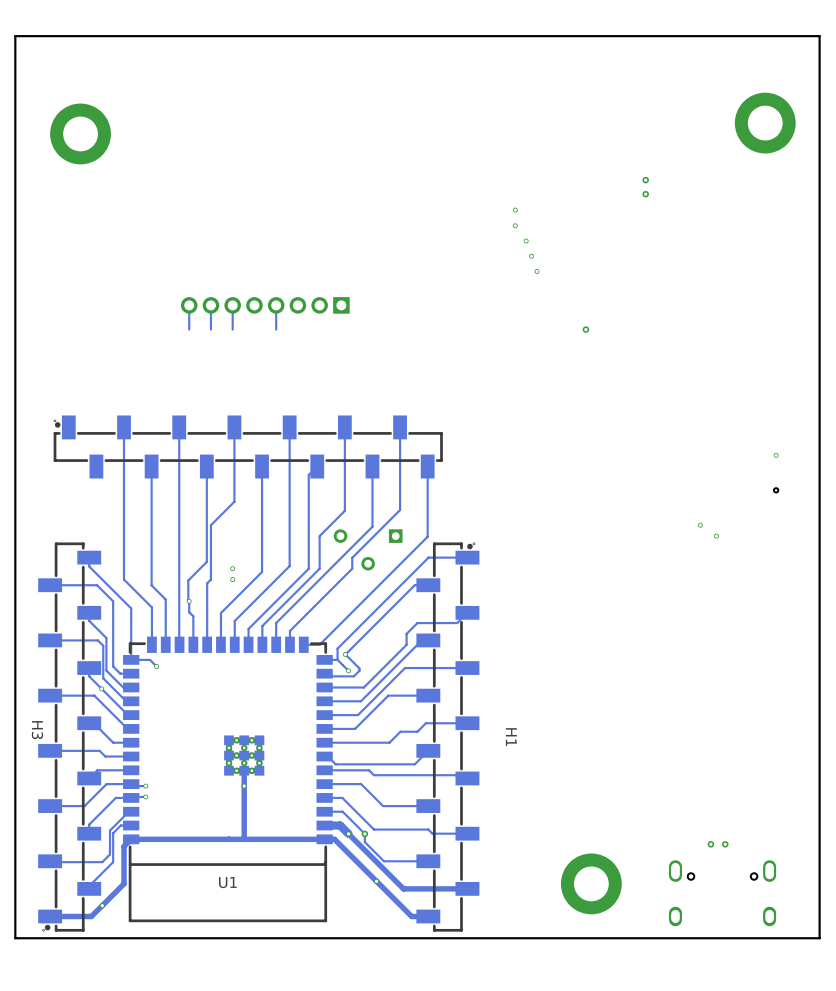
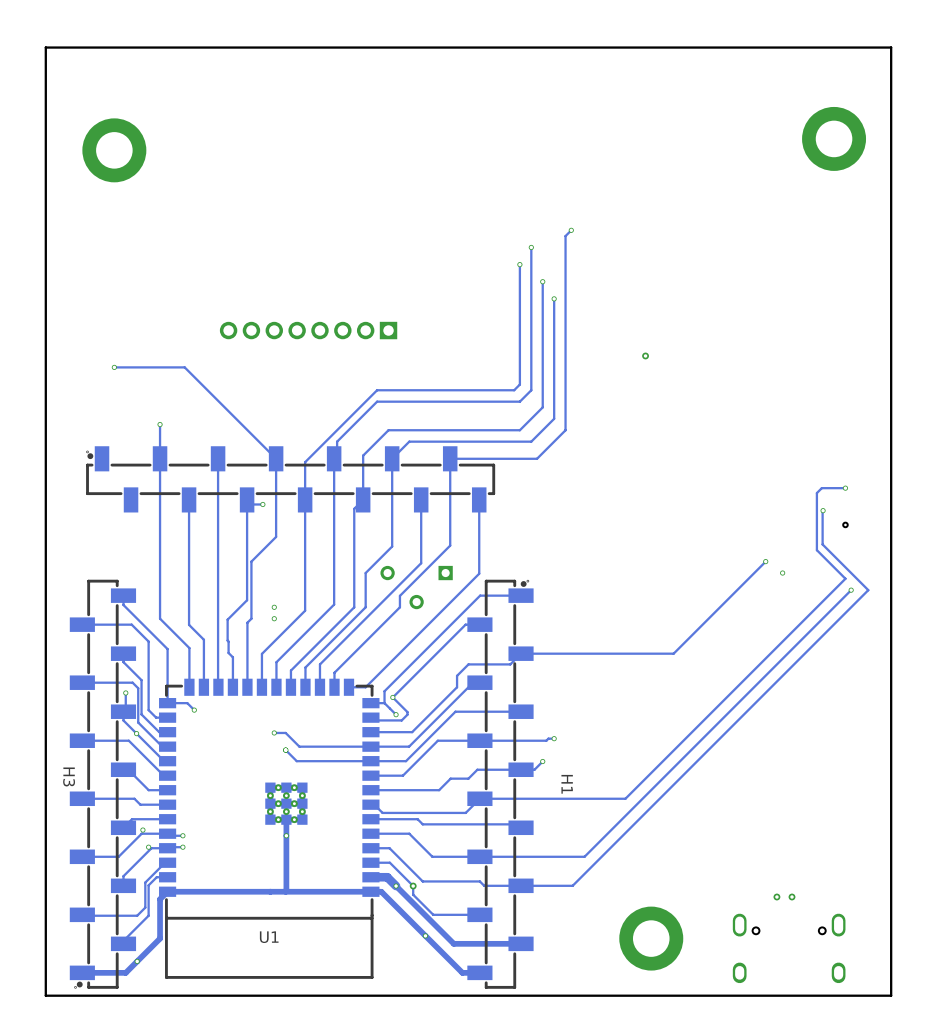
via: (645, 180) -> none
via: (645, 194) -> none
track: none -> (571, 230) (565, 236) (565, 430) (537, 458) (450, 458)
via: (515, 225) -> none
track: none -> (531, 247) (531, 390) (519, 401) (377, 401) (337, 441) (337, 455) (334, 458)
via: none -> (531, 247)
via: (526, 241) -> none
track: none -> (519, 264) (519, 384) (514, 390) (377, 390) (305, 462) (305, 499)
via: none -> (519, 264)
via: (531, 256) -> none
track: none -> (542, 281) (542, 407) (519, 430) (388, 430) (363, 455) (363, 499)
via: none -> (542, 281)
via: (537, 271) -> none
track: none -> (554, 298) (554, 418) (531, 441) (409, 441) (392, 458)
via: none -> (554, 298)
track: (189, 305) (189, 329) -> none
track: (210, 305) (210, 329) -> none
track: (232, 305) (232, 329) -> none
track: (276, 305) (276, 329) -> none
track: none -> (114, 367) (184, 367) (276, 458)
via: none -> (114, 367)
track: none -> (160, 424) (160, 458)
via: none -> (160, 424)
track: none -> (845, 488) (821, 488) (816, 493) (816, 550) (845, 578) (625, 798) (479, 798)
track: none -> (247, 499) (251, 504) (262, 504)
via: none -> (262, 504)
track: none -> (822, 510) (822, 544) (868, 590) (572, 885) (521, 885)
via: none -> (823, 510)
track: none -> (765, 561) (673, 653) (521, 653)
track: none -> (851, 590) (584, 856) (479, 856)
via: none -> (851, 590)
via: (189, 601) -> none
track: none -> (125, 692) (125, 709) (123, 711)
via: none -> (125, 692)
track: none -> (274, 732) (285, 732) (299, 746) (370, 746)
via: none -> (274, 732)
track: none -> (554, 738) (546, 740) (479, 740)
via: none -> (554, 738)
track: none -> (285, 750) (296, 761) (370, 761)
via: none -> (285, 750)
track: none -> (542, 761) (534, 769) (521, 769)
via: none -> (542, 761)
via: none -> (142, 830)
via: none -> (148, 847)

